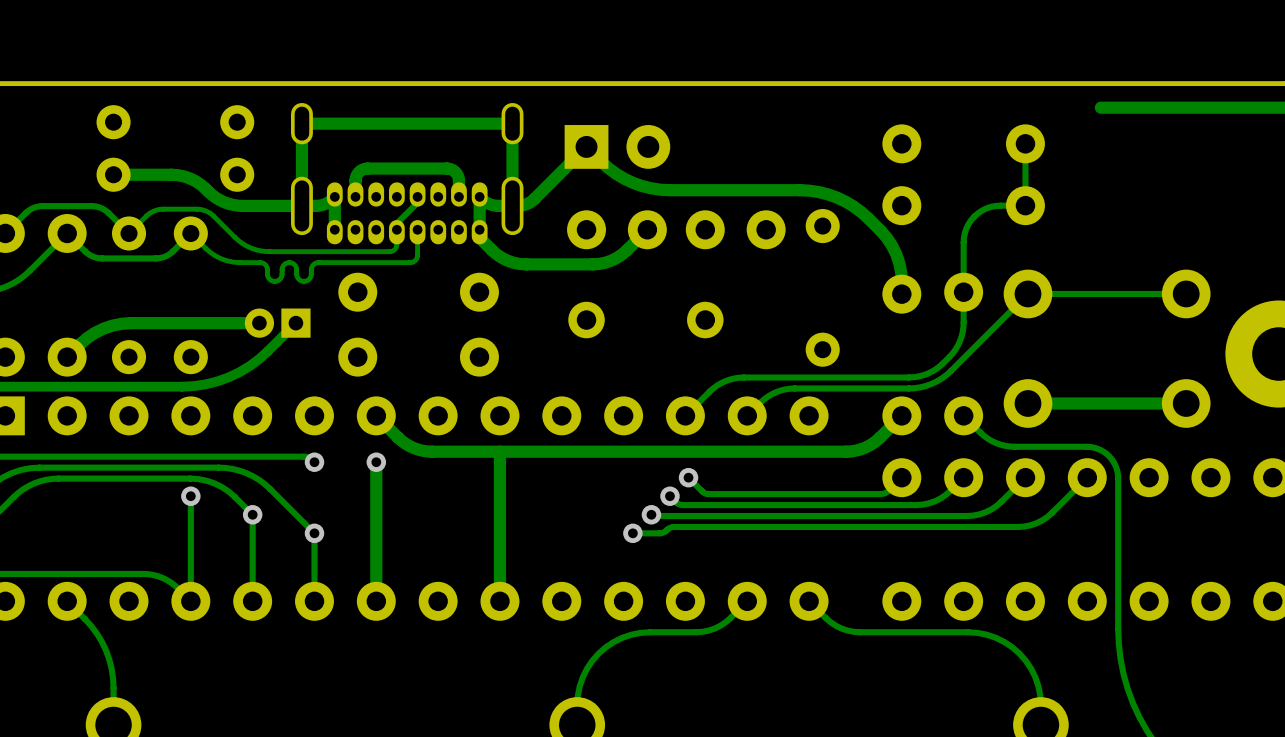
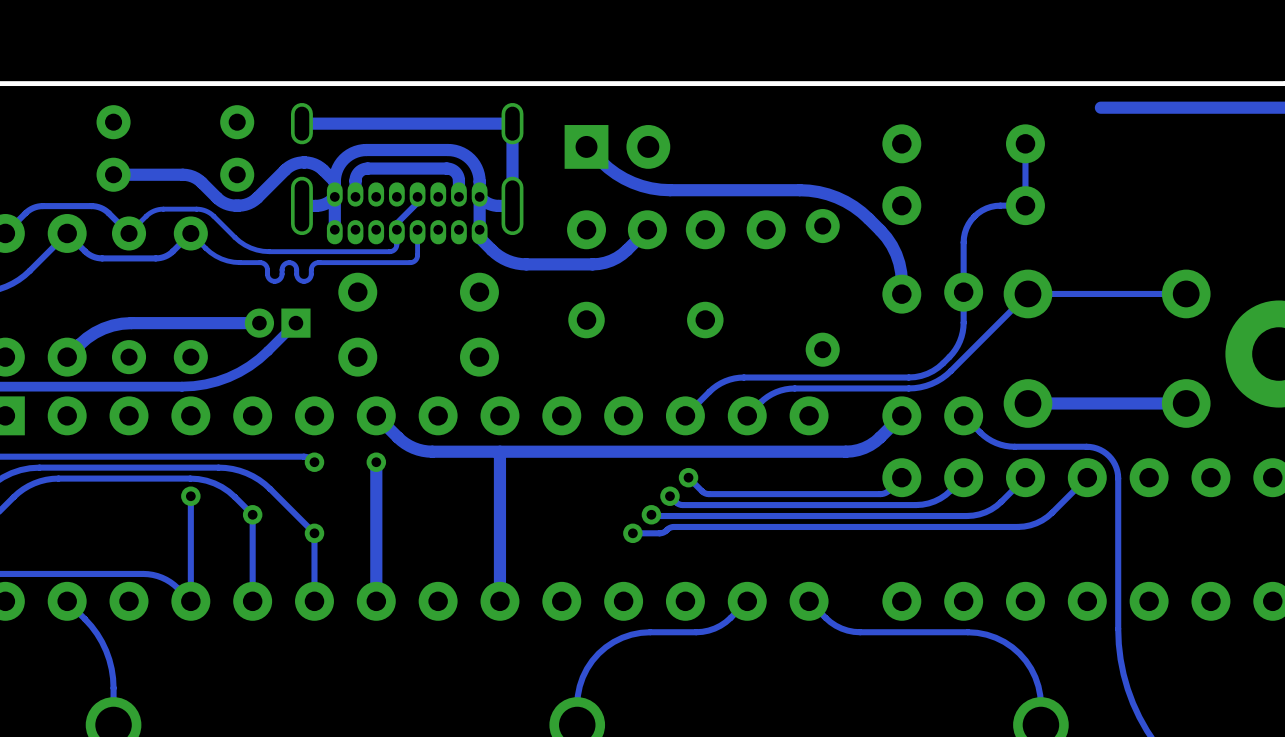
track: (301, 123) (301, 205) (233, 204) (215, 197) (190, 178) (171, 174) -> (334, 181) (317, 165) (307, 162) (298, 162) (286, 168) (254, 200) (245, 204) (235, 205) (221, 201) (193, 176) (171, 174)
track: (586, 146) (532, 200) (524, 204) (512, 205) -> none
track: none -> (334, 181) (336, 171) (341, 161) (349, 154) (359, 150) (451, 150) (464, 154) (474, 164) (479, 178) (479, 196)

